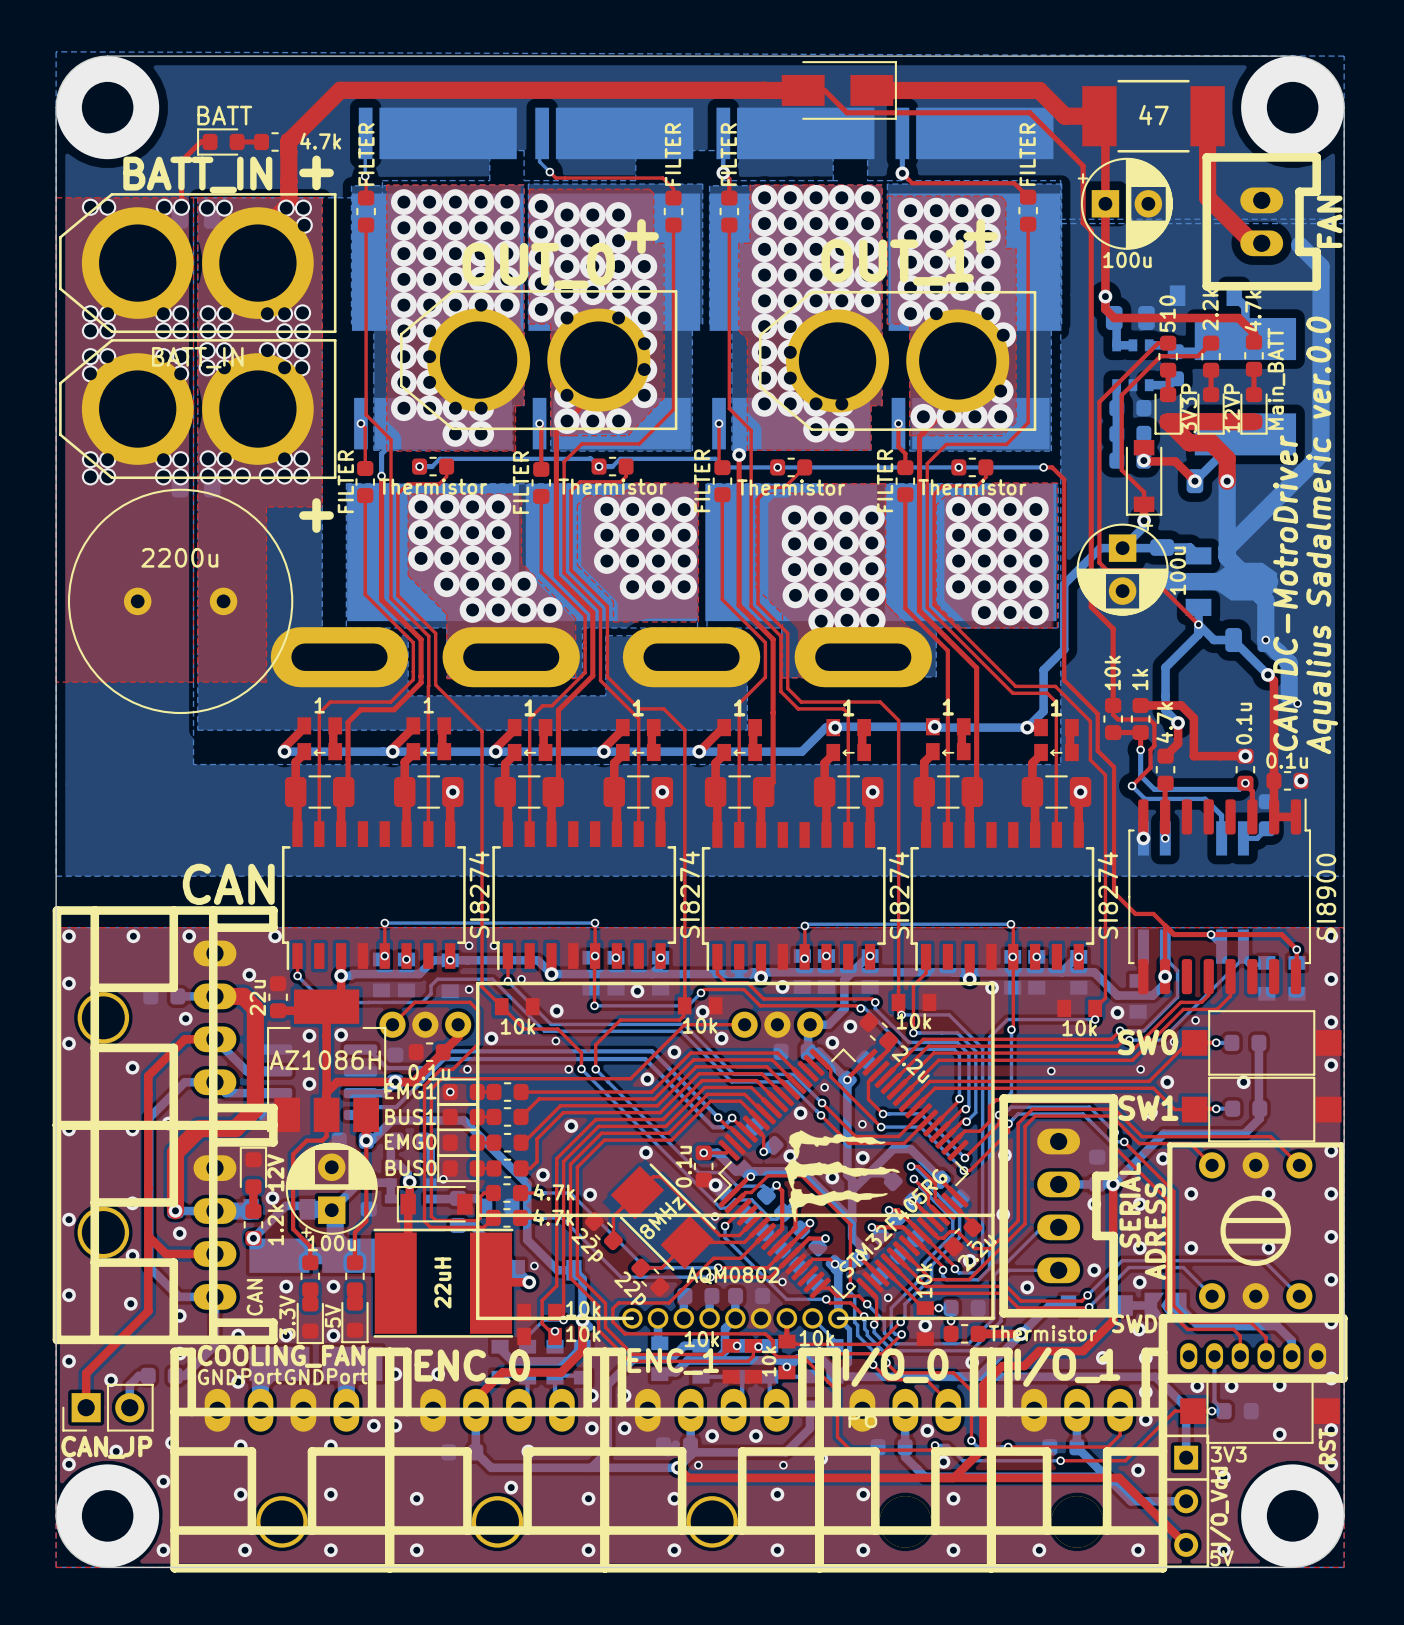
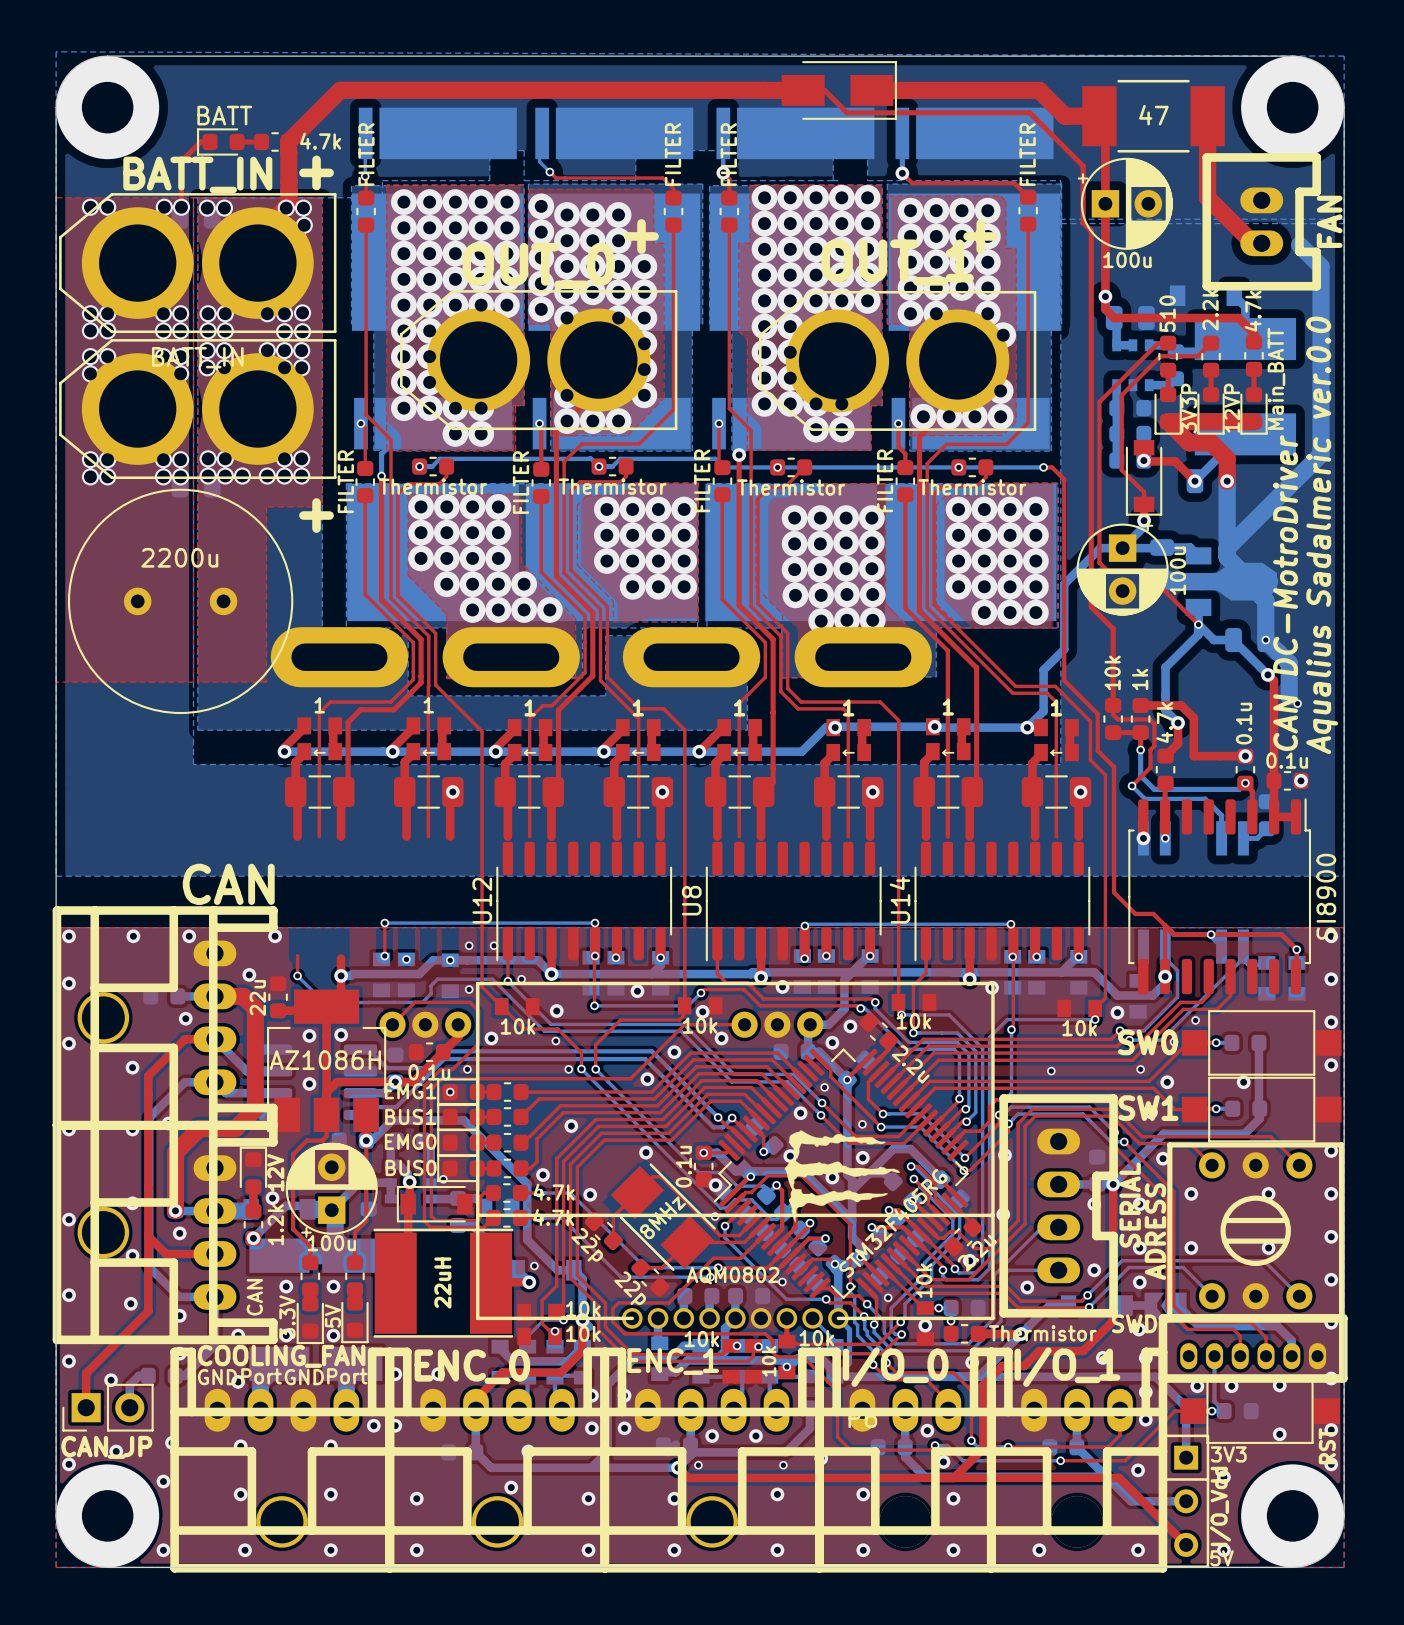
part: SI8274 (373, 895) -> none
part: SI8274 (584, 895) -> none
part: SI8274 (793, 896) -> none
part: SI8274 (1002, 896) -> none
U12: none -> (584, 901)
U8: none -> (793, 901)
U14: none -> (1002, 901)

